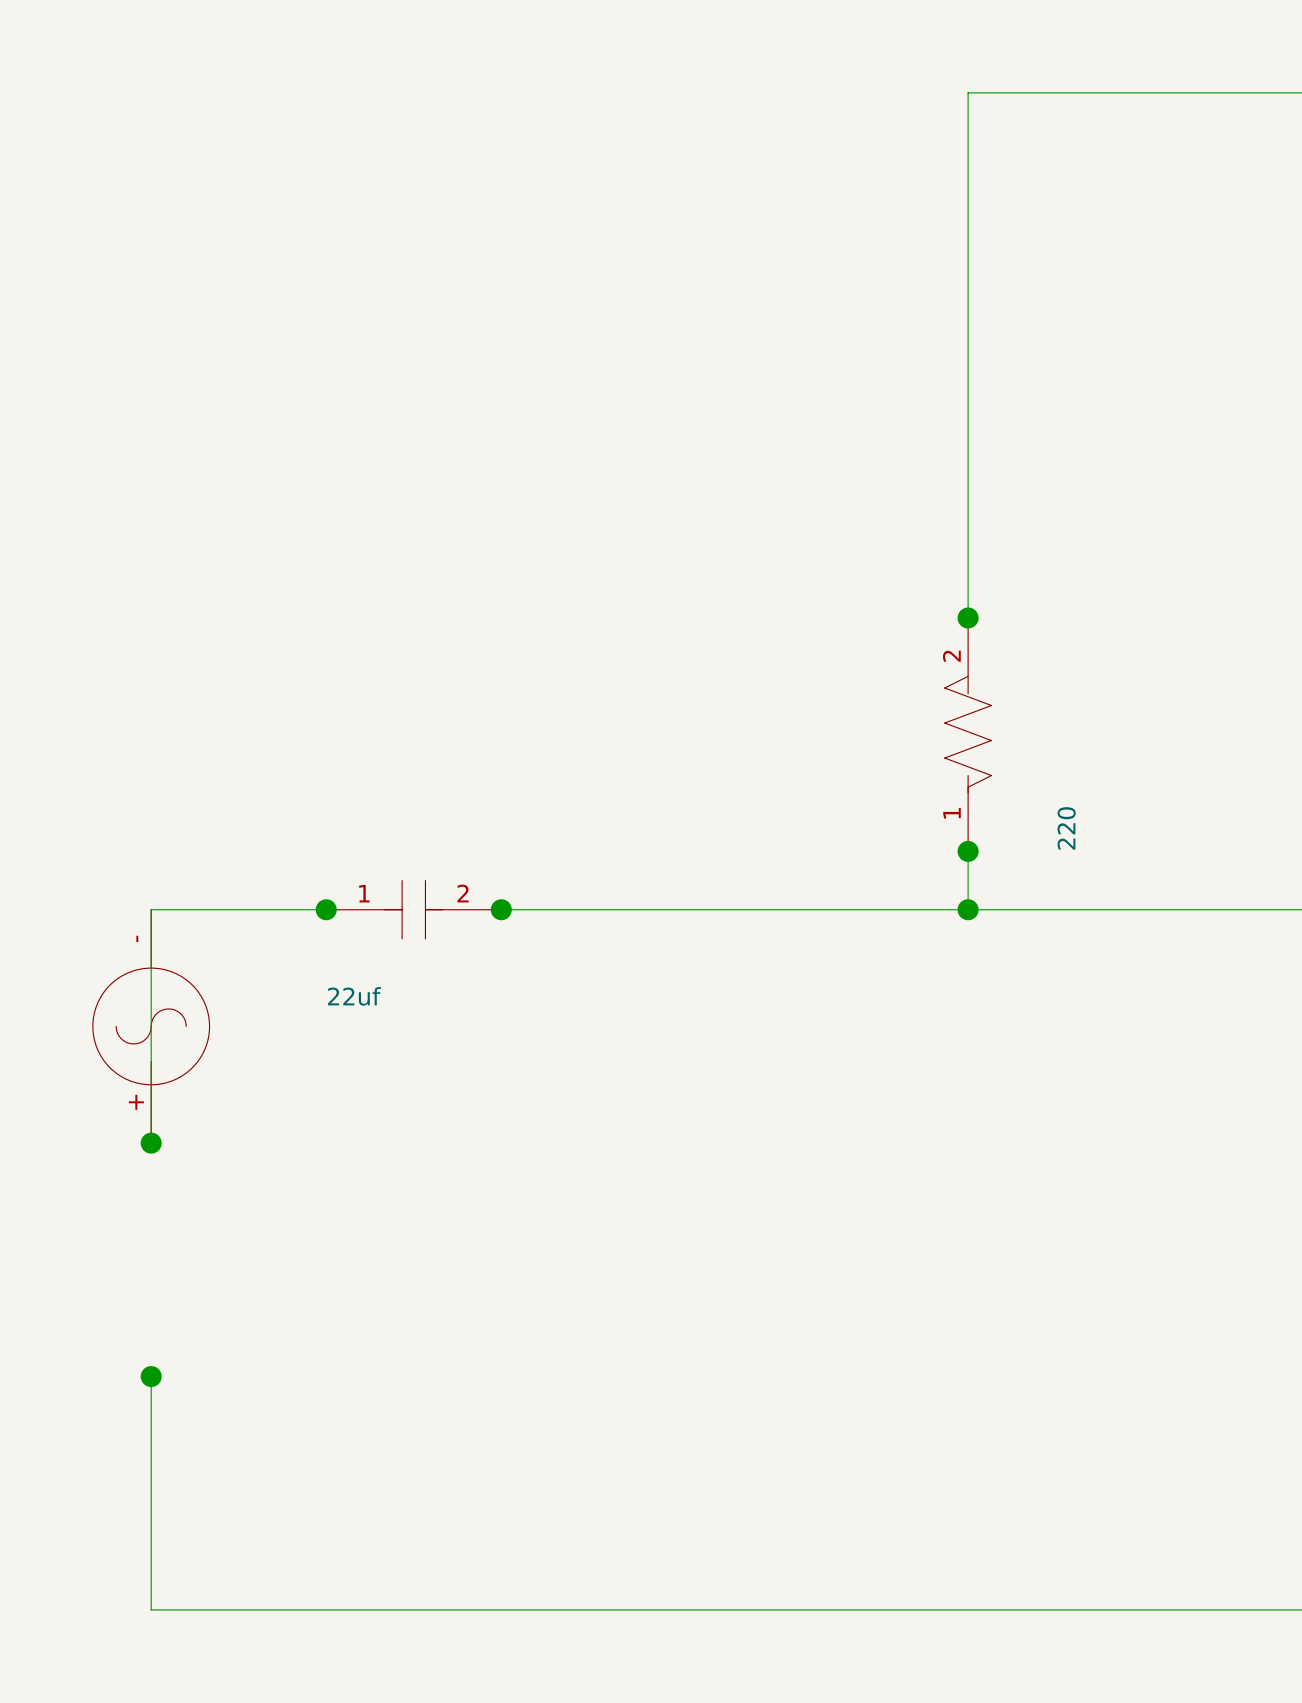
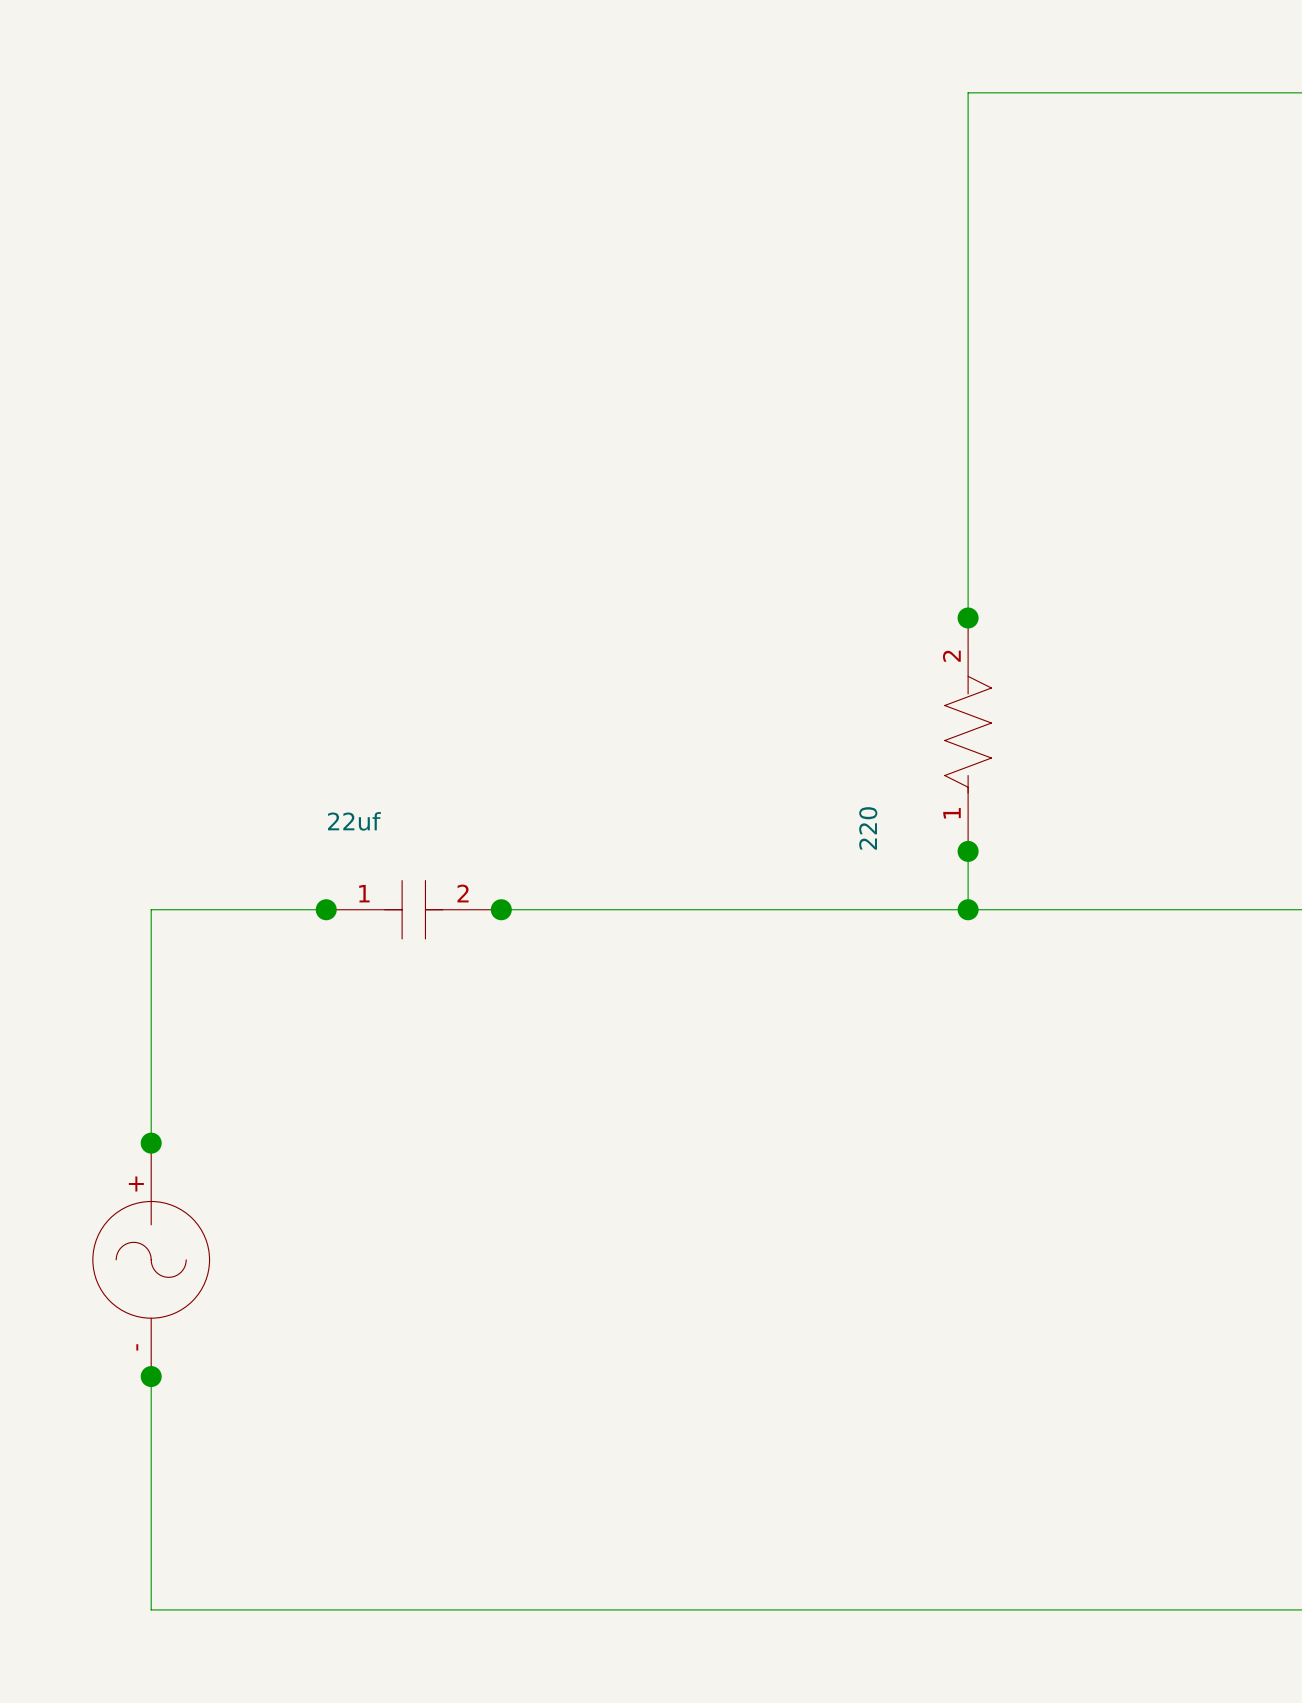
part flip: as is (968, 734) -> left-right (968, 734)
part value position: 22uf (354, 996) -> 22uf (354, 821)
part: (151, 1026) -> none
part: none -> (151, 1259)

